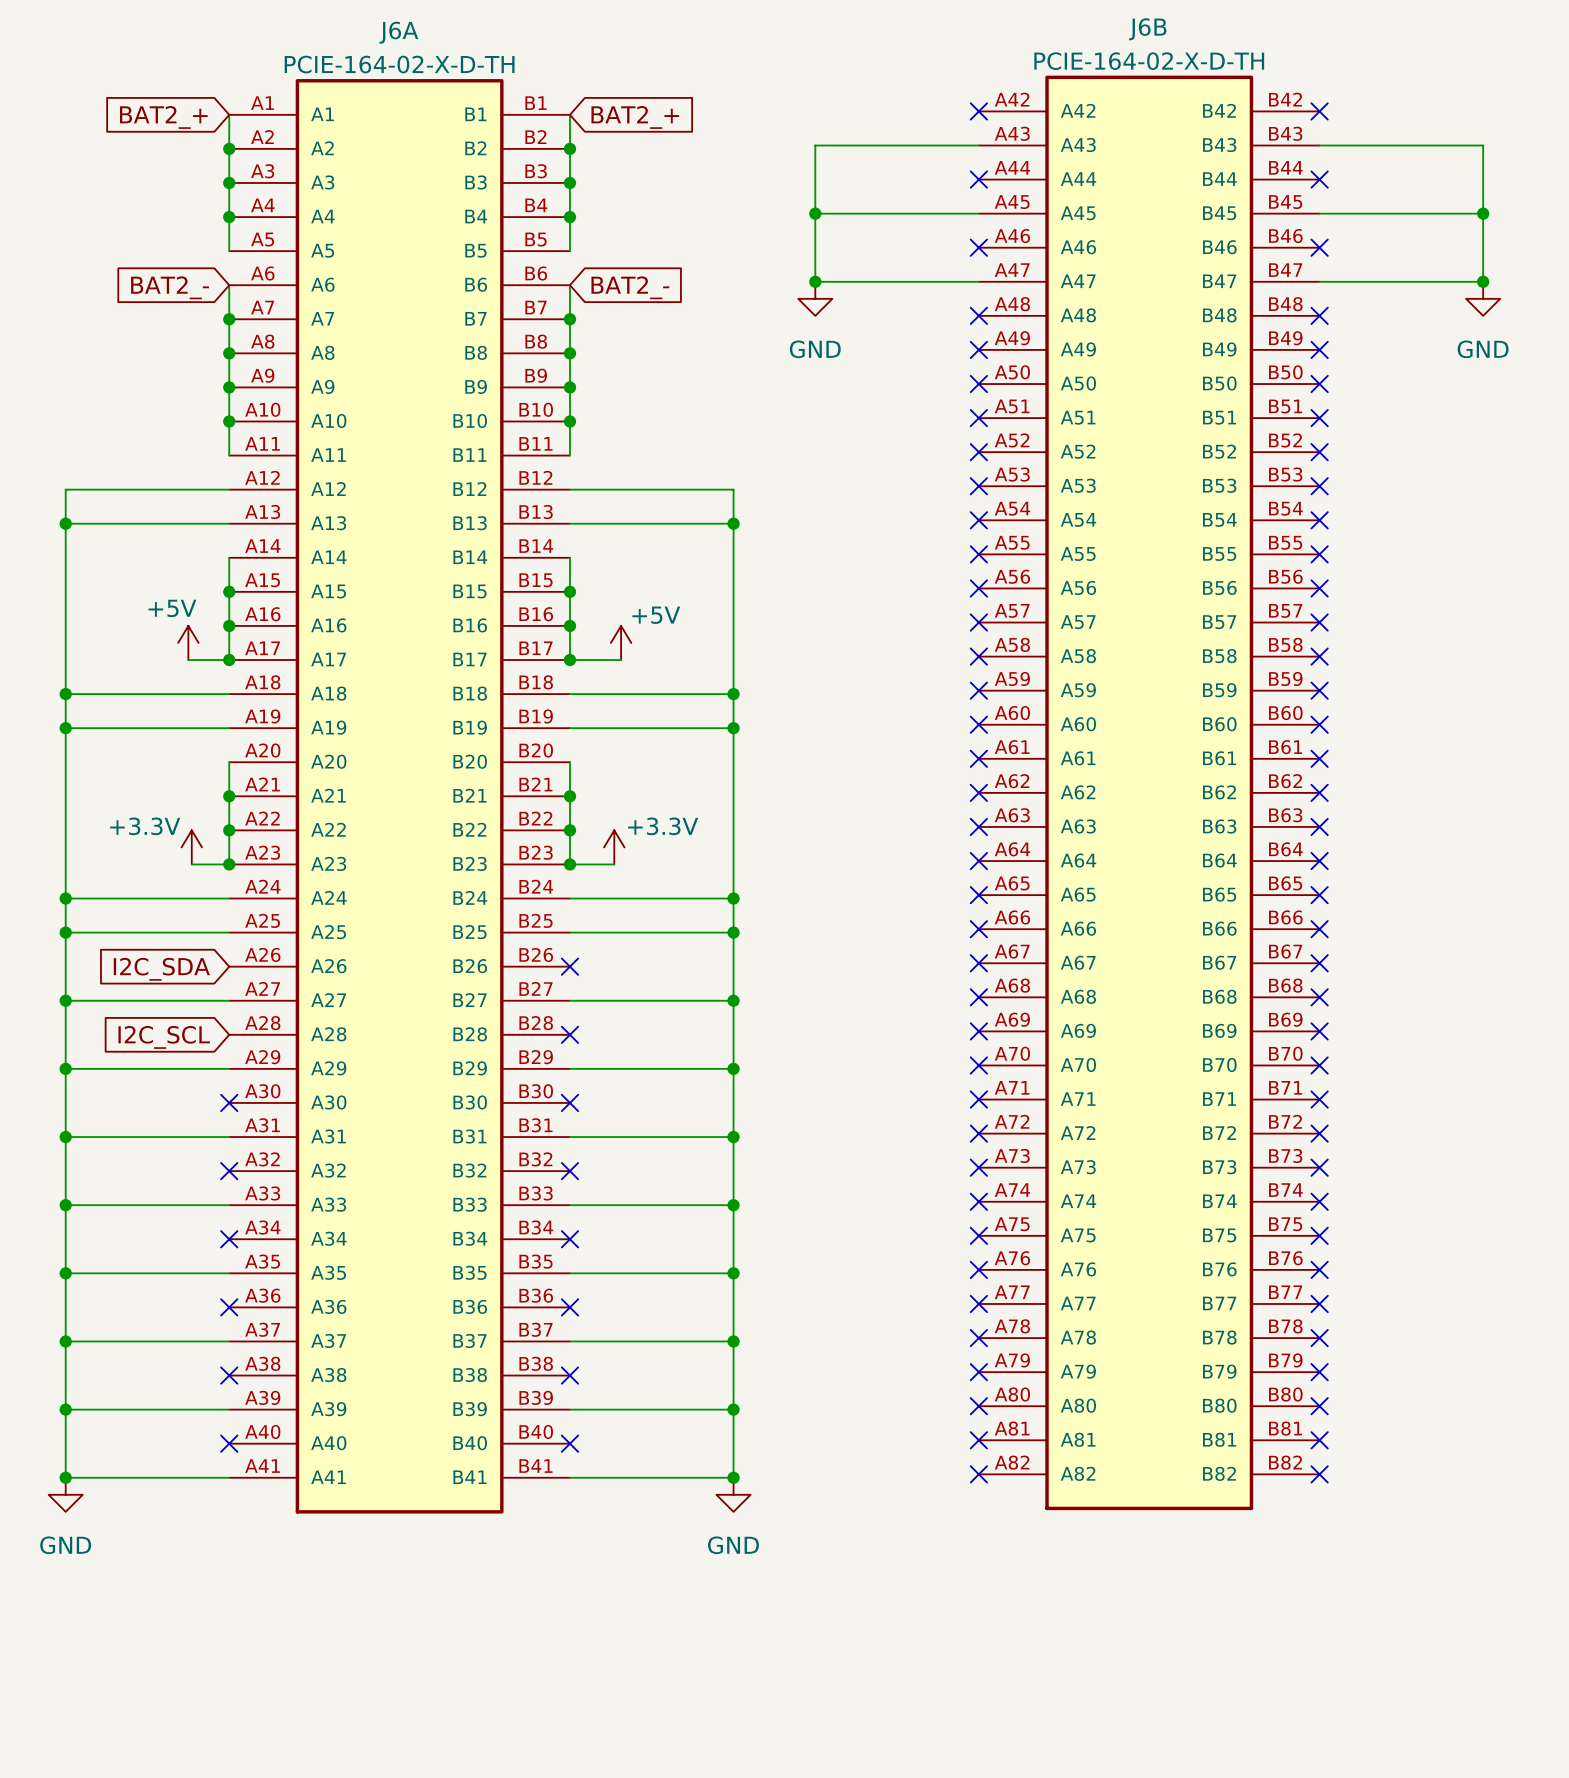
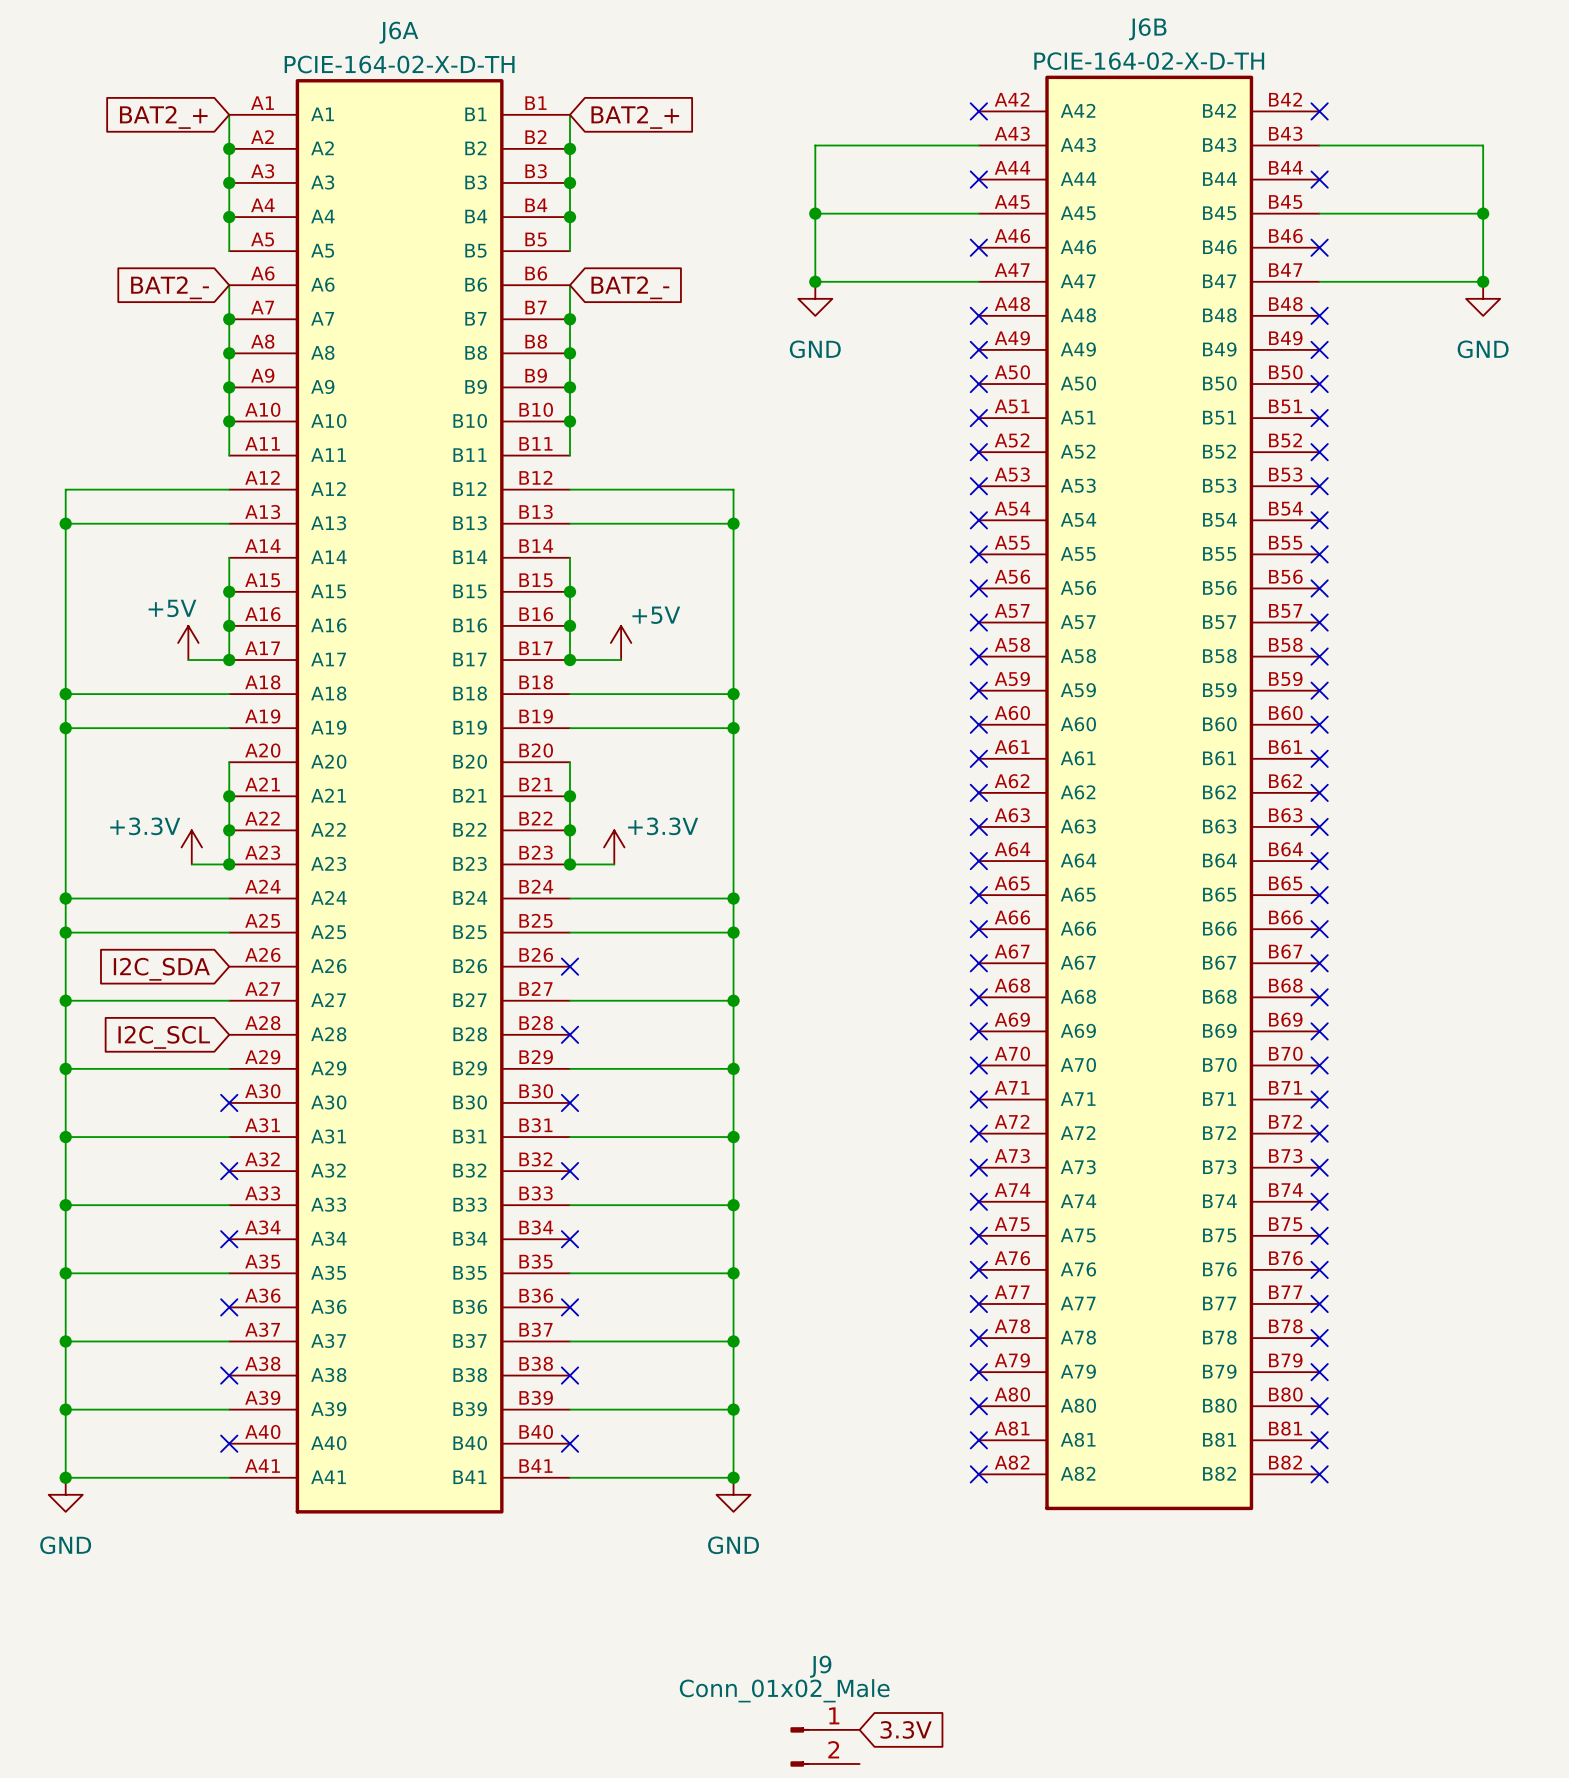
global label: none -> 3.3V (906, 1729)
J9: none -> Conn_01x02_Male (825, 1746)

